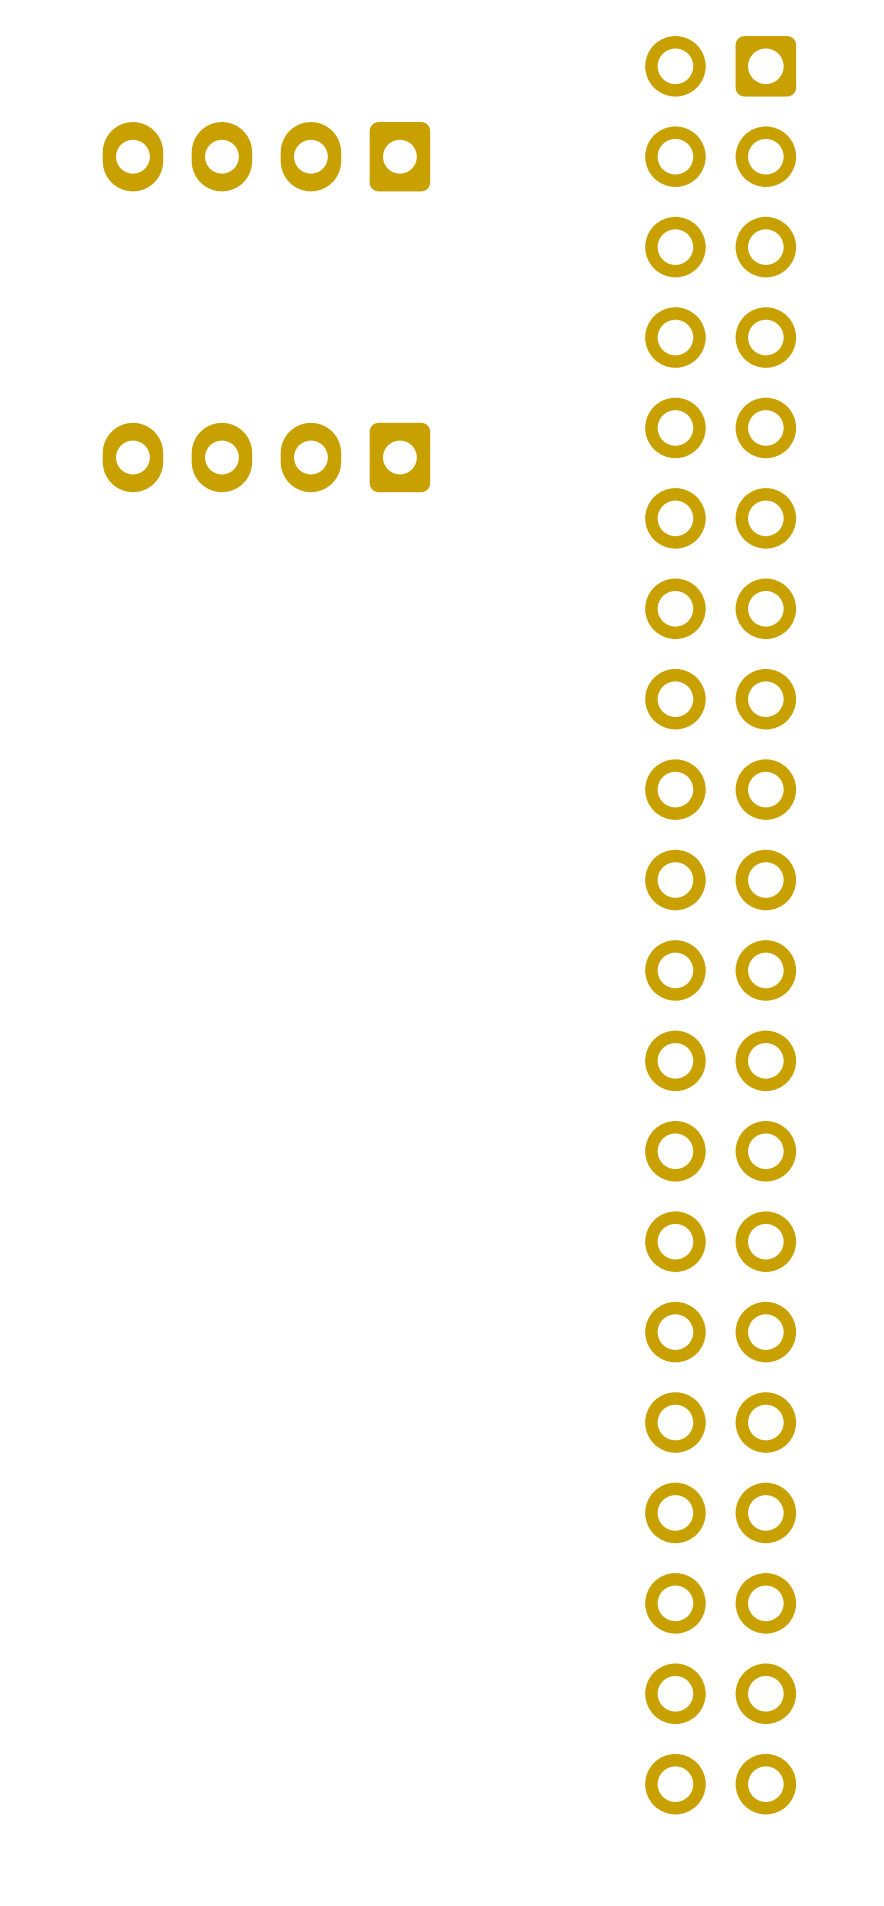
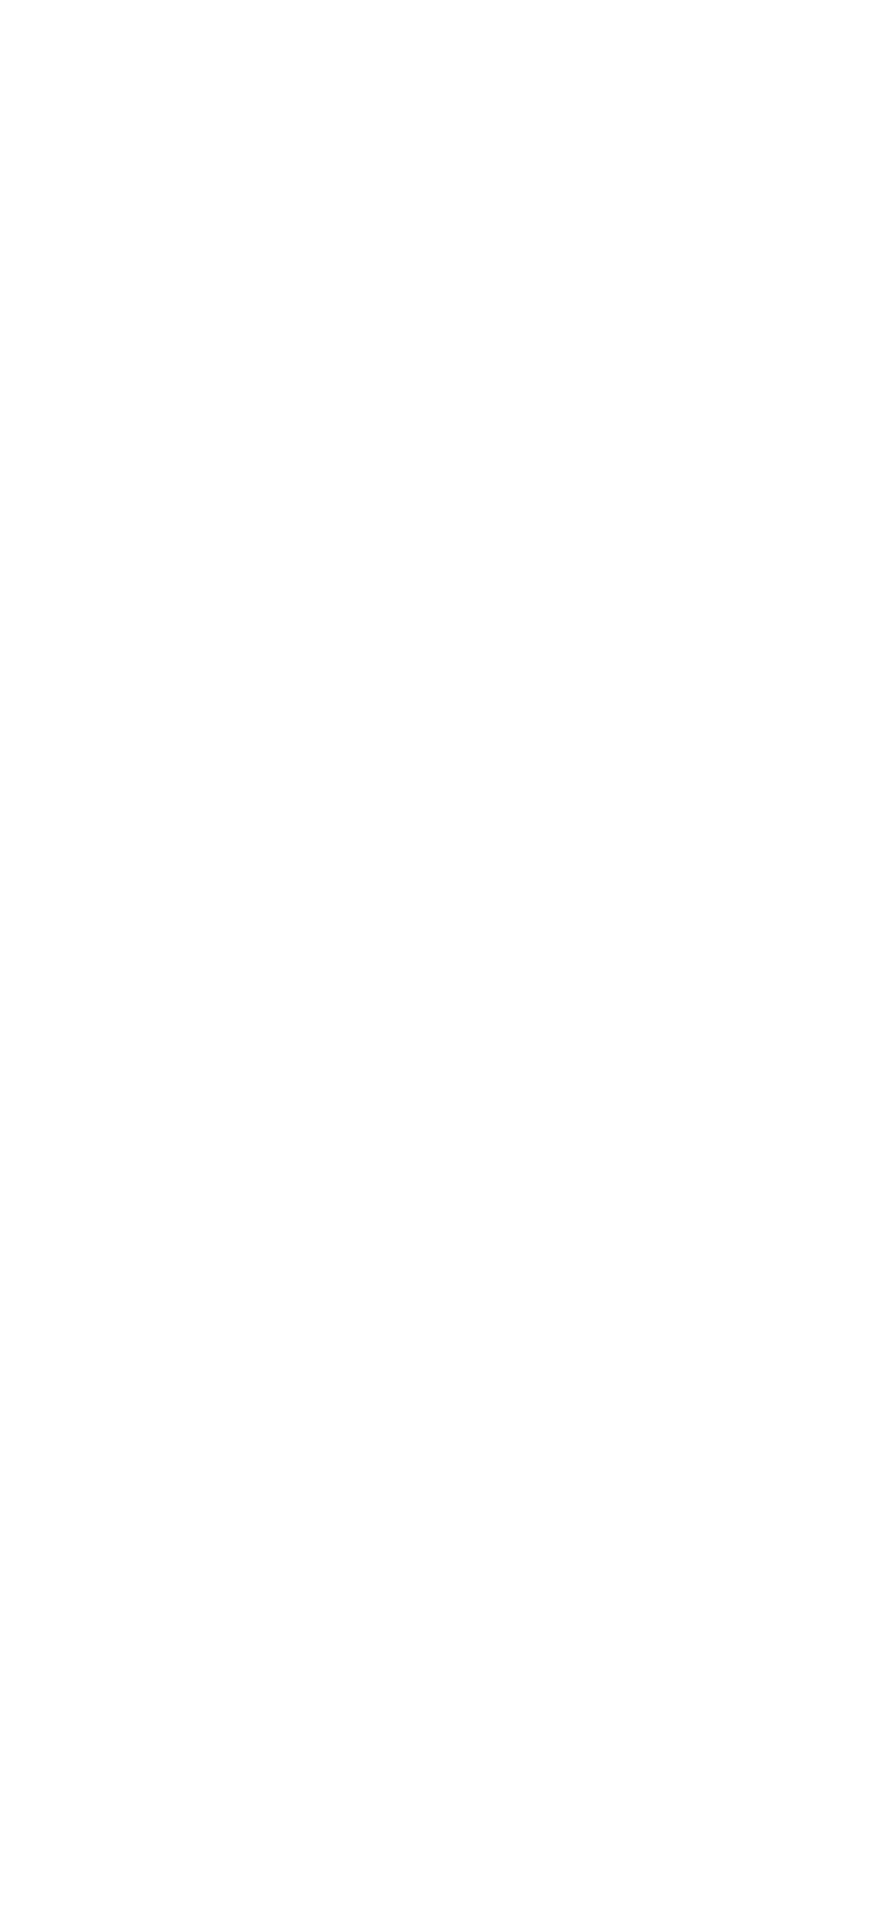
part: (266, 156) -> none
part: (266, 457) -> none
part: (720, 925) -> none

